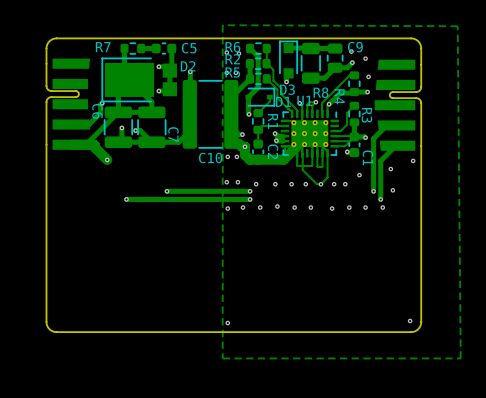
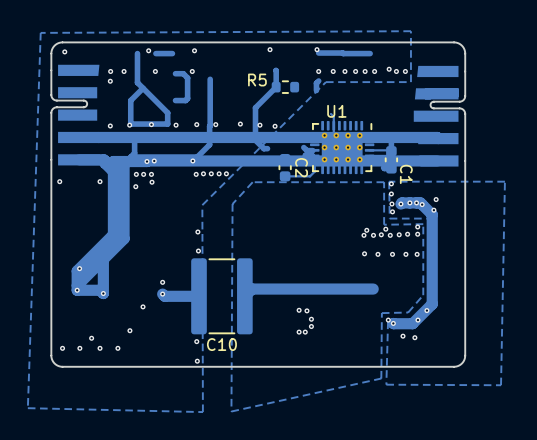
zone outline: (222, 25) (457, 26) (460, 358) (222, 358) (222, 25) -> none
zone outline: none -> (410, 31) (410, 82) (325, 82) (202, 205) (202, 412) (27, 408) (40, 32) (410, 31)
via: none -> (270, 49)
via: none -> (317, 49)
via: none -> (148, 50)
via: none -> (194, 50)
via: none -> (64, 51)
R7: (132, 48) -> none
C5: (163, 48) -> none
track: (171, 48) (171, 68) (169, 70) -> none
track: (250, 48) (258, 56) (258, 87) (248, 97) (249, 114) -> none
R6: (258, 48) -> none
track: (266, 48) (266, 63) (273, 69) (273, 80) (281, 88) (281, 94) (297, 110) (297, 113) -> none
via: (351, 51) -> none
via: (226, 52) -> none
via: (238, 53) -> none
C9: (335, 58) -> none
via: (365, 58) -> none
D3: (288, 59) -> none
track: (352, 62) (347, 67) (335, 67) (324, 78) (310, 78) -> none
R2: (258, 63) -> none
R8: (310, 63) -> none
via: none -> (110, 71)
via: none -> (124, 71)
via: none -> (155, 71)
via: none -> (192, 71)
via: none -> (318, 71)
via: none -> (333, 71)
via: none -> (344, 71)
via: none -> (355, 71)
via: none -> (365, 71)
via: none -> (374, 71)
via: none -> (396, 71)
via: none -> (405, 71)
via: (158, 66) -> none
via: (190, 71) -> none
via: (226, 72) -> none
via: (235, 72) -> none
via: none -> (110, 81)
track: (354, 75) (349, 75) (321, 103) (322, 113) -> none
via: (368, 76) -> none
track: (266, 78) (277, 89) (277, 98) (292, 113) -> none
D2: (139, 79) -> none
via: (286, 81) -> none
R4: (354, 83) -> none
via: (158, 91) -> none
track: (367, 92) (340, 93) (327, 105) (327, 113) -> none
via: (367, 92) -> none
D1: (260, 97) -> none
track: (269, 97) (269, 101) (258, 113) -> none
via: (315, 102) -> none
track: (102, 103) (100, 112) (89, 124) -> none
via: (102, 103) -> none
via: (299, 103) -> none
via: (329, 104) -> none
track: (354, 105) (347, 113) (347, 124) (340, 131) (334, 131) -> none
track: (118, 112) (85, 144) (71, 144) -> none
via: none -> (151, 124)
via: none -> (196, 124)
via: none -> (215, 124)
via: none -> (240, 124)
via: none -> (129, 125)
via: none -> (176, 125)
via: none -> (259, 125)
track: (312, 113) (312, 105) (315, 102) (309, 102) (307, 104) (307, 113) -> none
via: none -> (110, 125)
C10 position: (210, 114) -> (221, 296)
R3: (354, 114) -> none
R1: (258, 121) -> none
track: (396, 125) (386, 125) (373, 138) (373, 191) -> (438, 138) (98, 137)
track: (285, 126) (261, 126) (258, 129) (258, 143) -> none
C6: (118, 127) -> none
via: (121, 127) -> none
C7: (151, 127) -> none
track: (135, 130) (140, 130) (151, 142) -> none
via: (135, 130) -> none
via: (275, 133) -> none
via: (242, 134) -> none
track: (354, 136) (365, 137) -> none
via: (365, 137) -> none
via: (276, 140) -> none
track: (238, 143) (245, 146) (245, 154) (249, 159) (283, 159) (309, 133) (327, 151) (327, 177) (320, 184) (316, 184) (302, 170) (302, 146) (304, 144) -> none
track: (325, 144) (322, 147) (321, 167) (317, 166) (317, 146) (315, 144) (312, 147) (311, 166) (297, 165) (297, 147) (293, 144) (292, 153) -> none
via: none -> (154, 160)
via: none -> (192, 160)
track: (395, 145) (380, 160) (380, 199) -> (437, 160) (113, 161) (113, 234) (77, 271) (77, 290) (100, 290) (103, 293) (103, 259)
track: none -> (124, 161) (124, 238) (77, 285)
via: none -> (146, 161)
via: (245, 146) -> none
via: (347, 151) -> none
via: (227, 156) -> none
via: (236, 156) -> none
via: none -> (136, 174)
via: none -> (143, 174)
via: none -> (151, 174)
via: none -> (196, 174)
via: none -> (203, 173)
via: none -> (211, 173)
via: none -> (219, 173)
via: none -> (226, 173)
via: (107, 159) -> none
via: (413, 160) -> none
via: none -> (59, 181)
via: none -> (100, 181)
via: none -> (152, 182)
zone outline: none -> (384, 182) (384, 224) (423, 224) (423, 295) (408, 312) (381, 313) (381, 378) (231, 411) (232, 204) (252, 182) (384, 182)
zone outline: none -> (504, 181) (501, 385) (386, 384) (388, 321) (413, 321) (430, 304) (430, 218) (389, 218) (389, 181) (504, 181)
via: none -> (391, 183)
via: none -> (135, 186)
via: (390, 169) -> none
via: none -> (391, 193)
via: (359, 175) -> none
via: none -> (436, 199)
via: (226, 182) -> none
via: (237, 182) -> none
via: none -> (409, 202)
via: none -> (416, 202)
via: (256, 184) -> none
via: (275, 184) -> none
via: (291, 184) -> none
via: (305, 184) -> none
via: (320, 184) -> none
via: (334, 184) -> none
via: (345, 184) -> none
via: none -> (391, 204)
track: none -> (400, 204) (420, 202) (432, 214) (432, 304) (412, 323) (393, 323)
via: none -> (400, 204)
via: none -> (422, 204)
via: (167, 191) -> none
track: (250, 191) (167, 191) -> none
via: (250, 191) -> none
via: none -> (392, 211)
via: (373, 191) -> none
via: (126, 199) -> none
track: (250, 199) (126, 199) -> none
via: (250, 199) -> none
via: (380, 199) -> none
via: none -> (417, 226)
via: (277, 206) -> none
via: (242, 207) -> none
via: (260, 207) -> none
via: (294, 207) -> none
via: (310, 207) -> none
via: (365, 207) -> none
via: (382, 207) -> none
via: (227, 208) -> none
via: none -> (197, 232)
via: none -> (381, 234)
via: none -> (399, 234)
via: none -> (407, 234)
via: none -> (417, 234)
via: none -> (363, 235)
via: none -> (373, 235)
via: none -> (390, 235)
via: none -> (198, 251)
via: none -> (364, 253)
via: none -> (377, 254)
via: none -> (392, 254)
via: none -> (405, 254)
via: none -> (417, 254)
via: none -> (79, 268)
via: none -> (162, 282)
track: none -> (373, 289) (252, 289) (244, 296)
via: none -> (77, 290)
via: none -> (103, 293)
track: none -> (162, 294) (164, 296) (199, 296)
via: none -> (162, 294)
via: none -> (143, 306)
via: none -> (299, 310)
via: none -> (306, 310)
via: none -> (426, 310)
via: none -> (311, 319)
via: none -> (388, 320)
via: none -> (417, 320)
via: none -> (393, 323)
via: none -> (311, 326)
via: none -> (129, 330)
via: none -> (299, 332)
via: none -> (305, 332)
via: none -> (402, 336)
via: none -> (414, 337)
via: none -> (91, 338)
via: none -> (196, 341)
via: none -> (62, 348)
via: none -> (79, 348)
via: none -> (100, 348)
via: none -> (117, 348)
via: (410, 320) -> none
via: (227, 323) -> none
via: none -> (197, 361)

